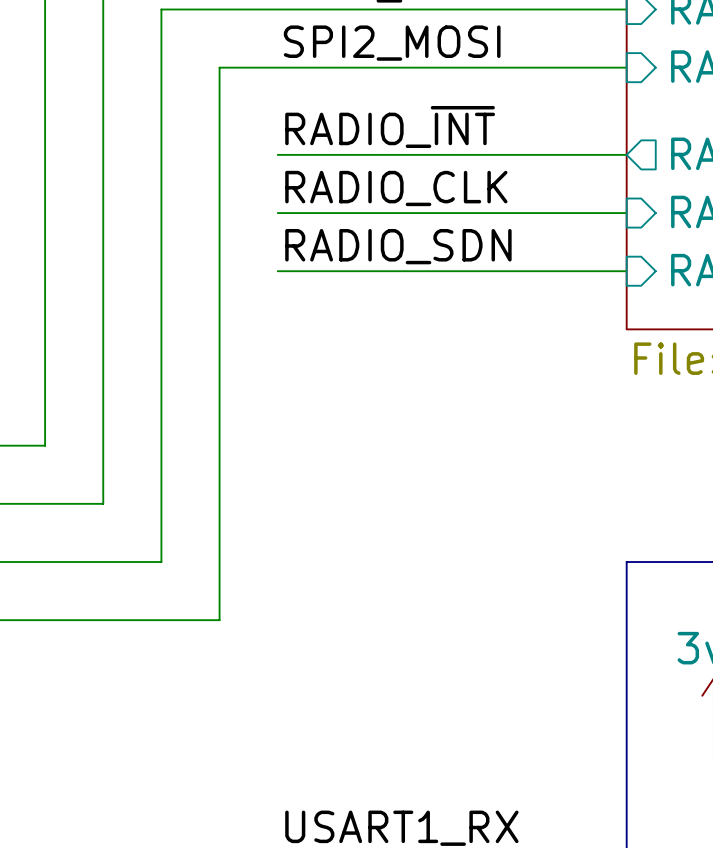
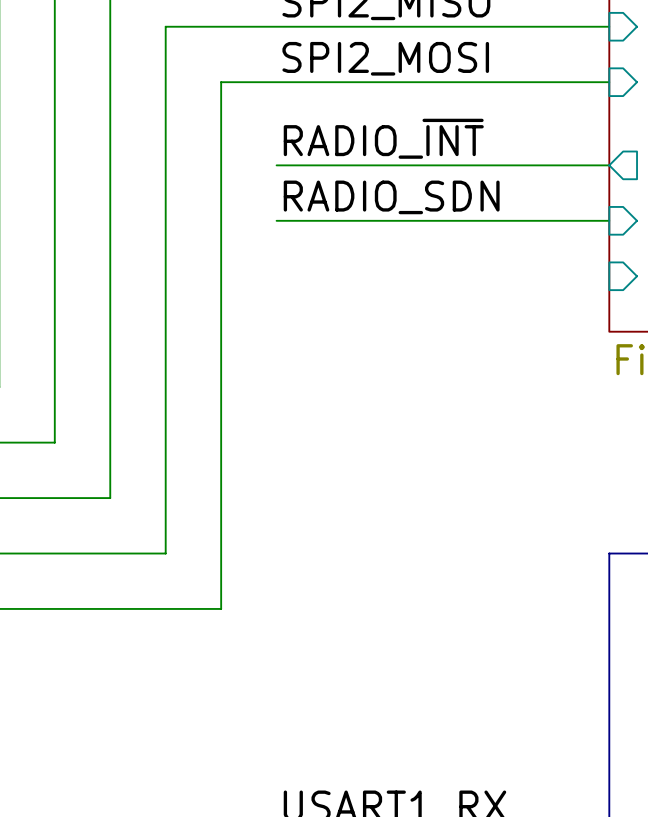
label: RADIO_CLK (396, 188) -> RADIO_SDN (391, 197)
label: RADIO_SDN (398, 246) -> none
wire: (277, 271) (626, 271) -> none

